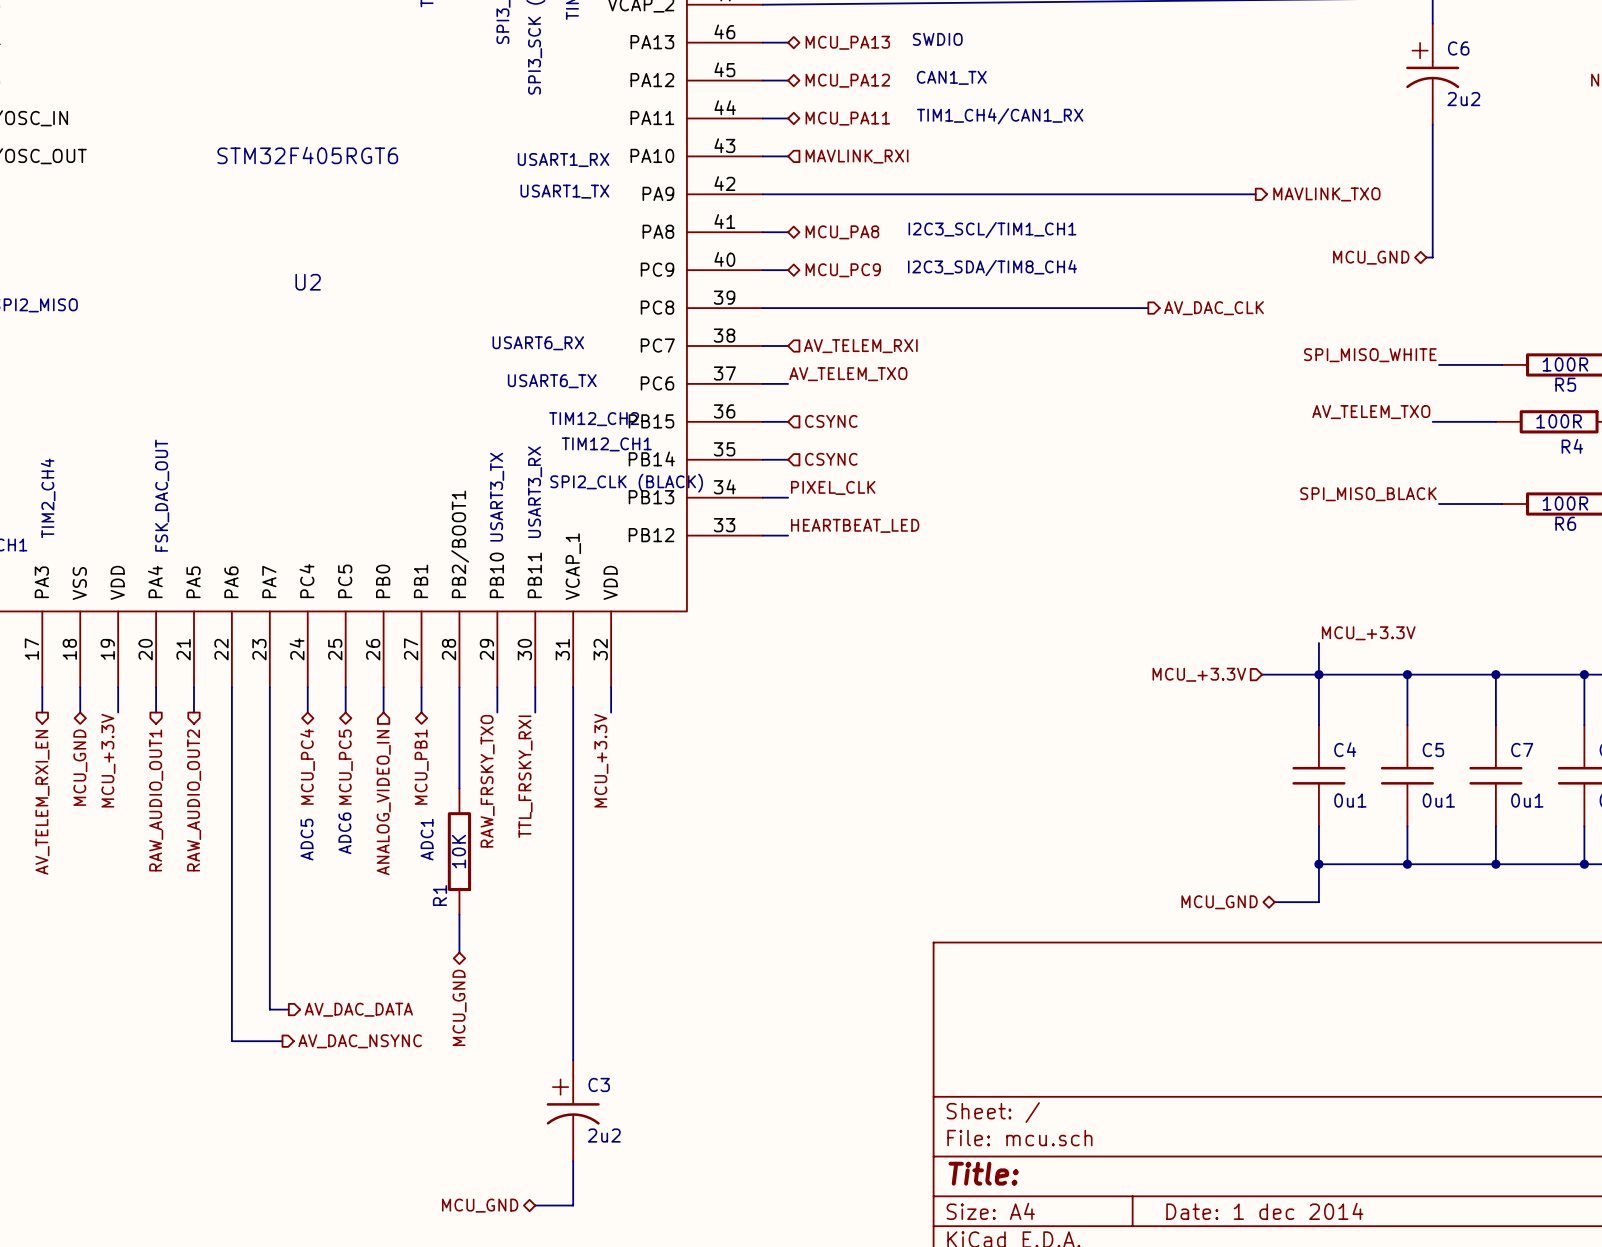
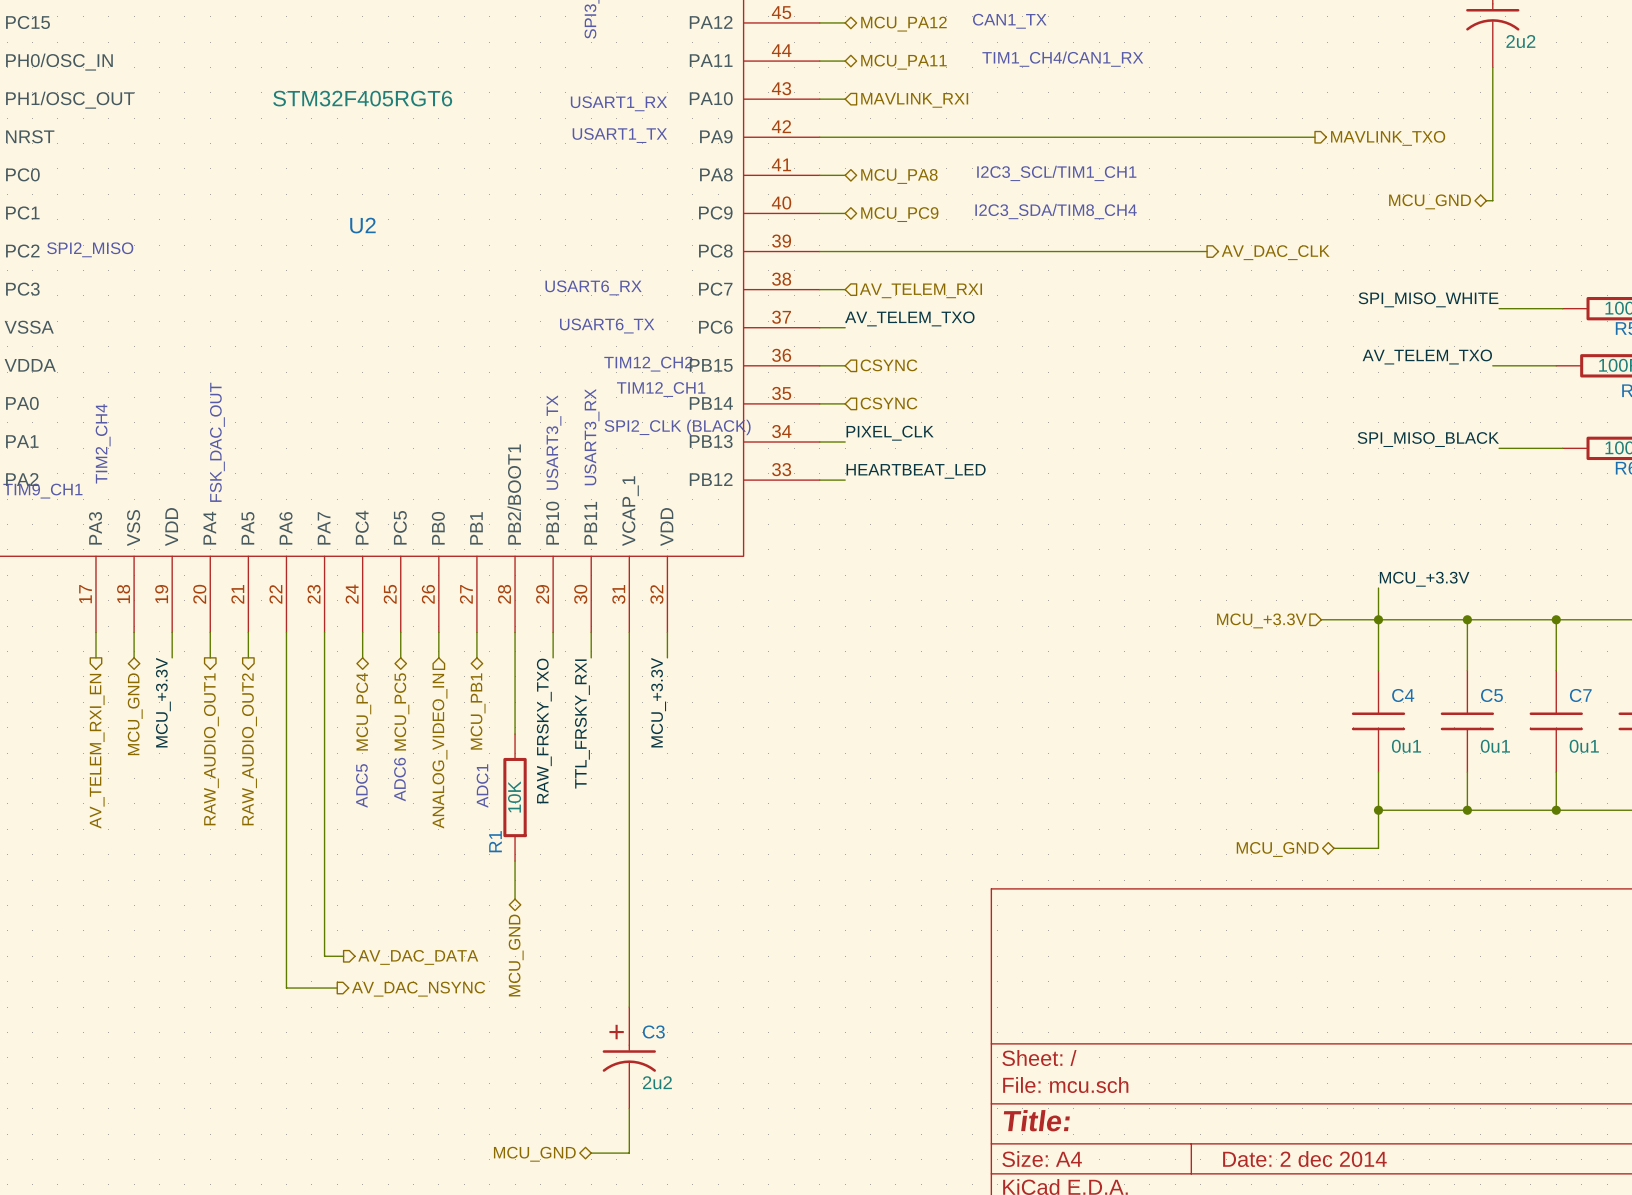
title block: Date: 1 dec 2014 (1264, 1211) -> Date: 2 dec 2014 (1304, 1159)

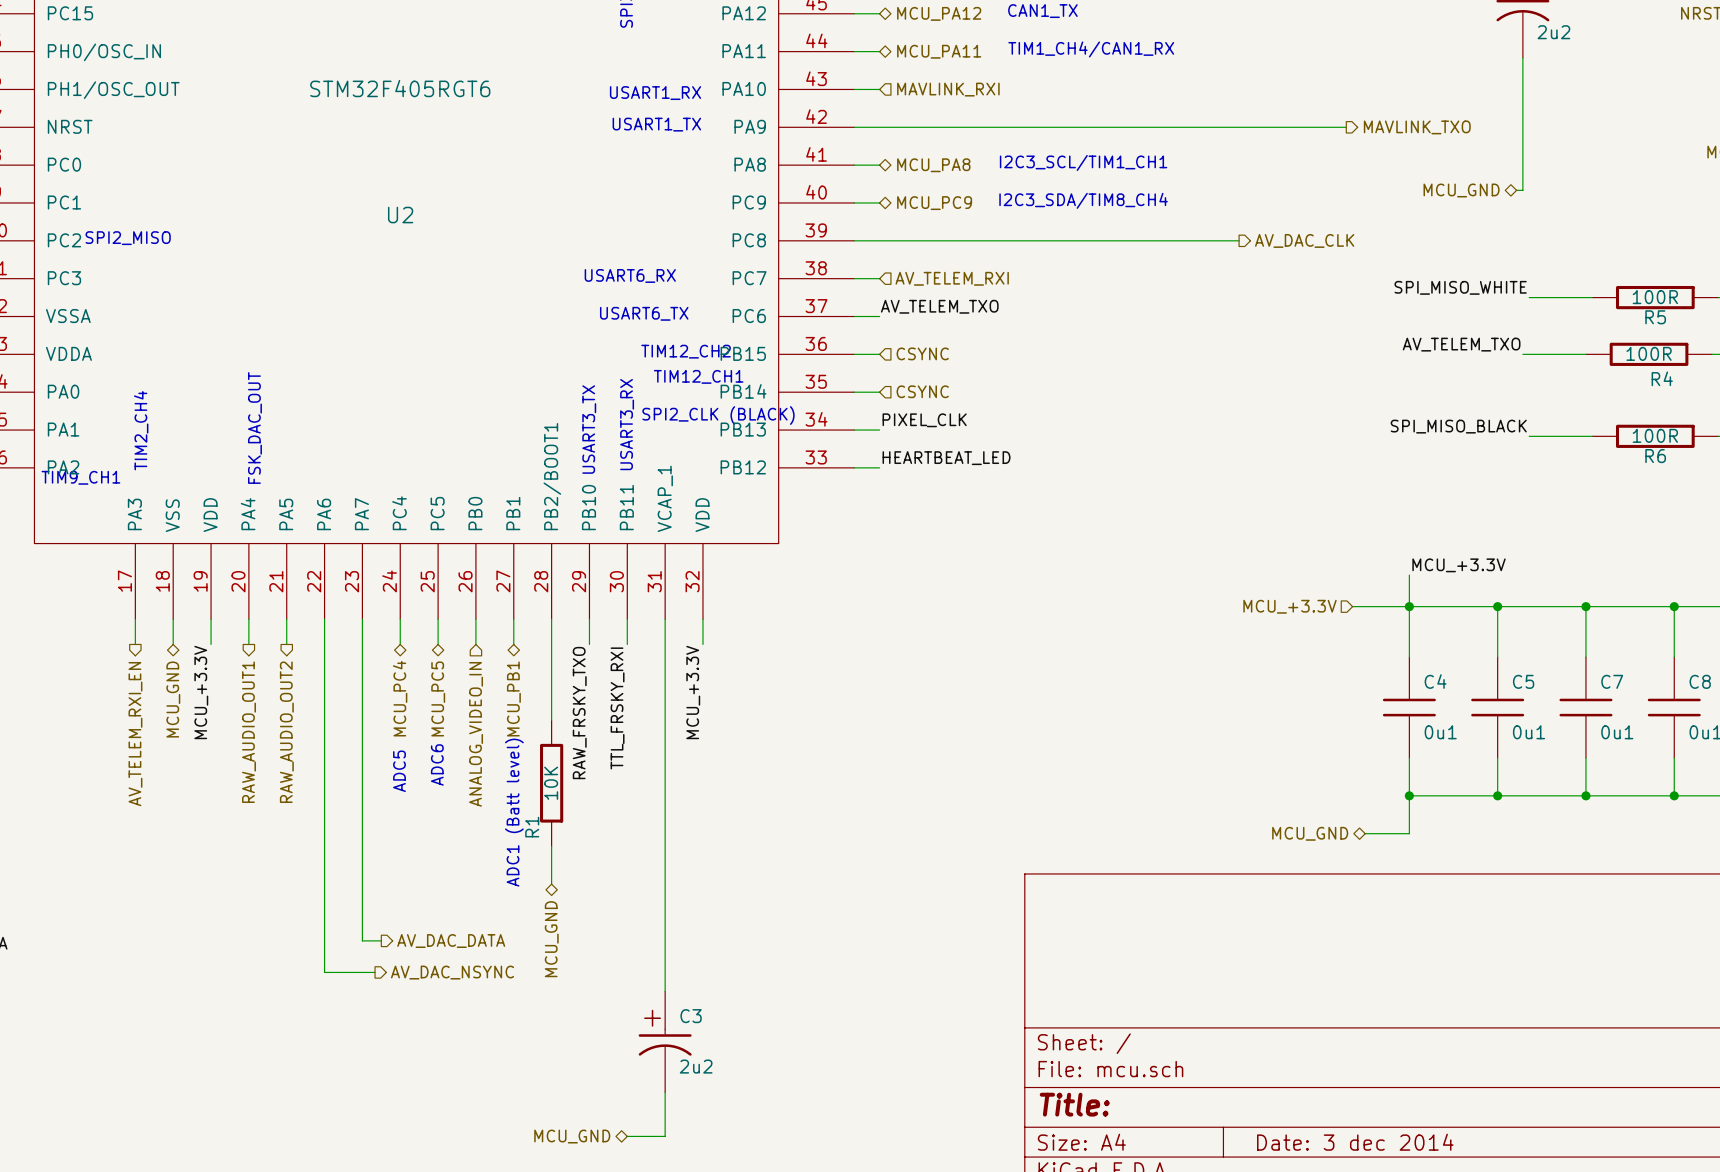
text: ADC1 (482, 785) -> none
text: none -> ADC1 (Batt level) (514, 812)
title block: Date: 2 dec 2014 (1304, 1159) -> Date: 3 dec 2014 (1355, 1142)

